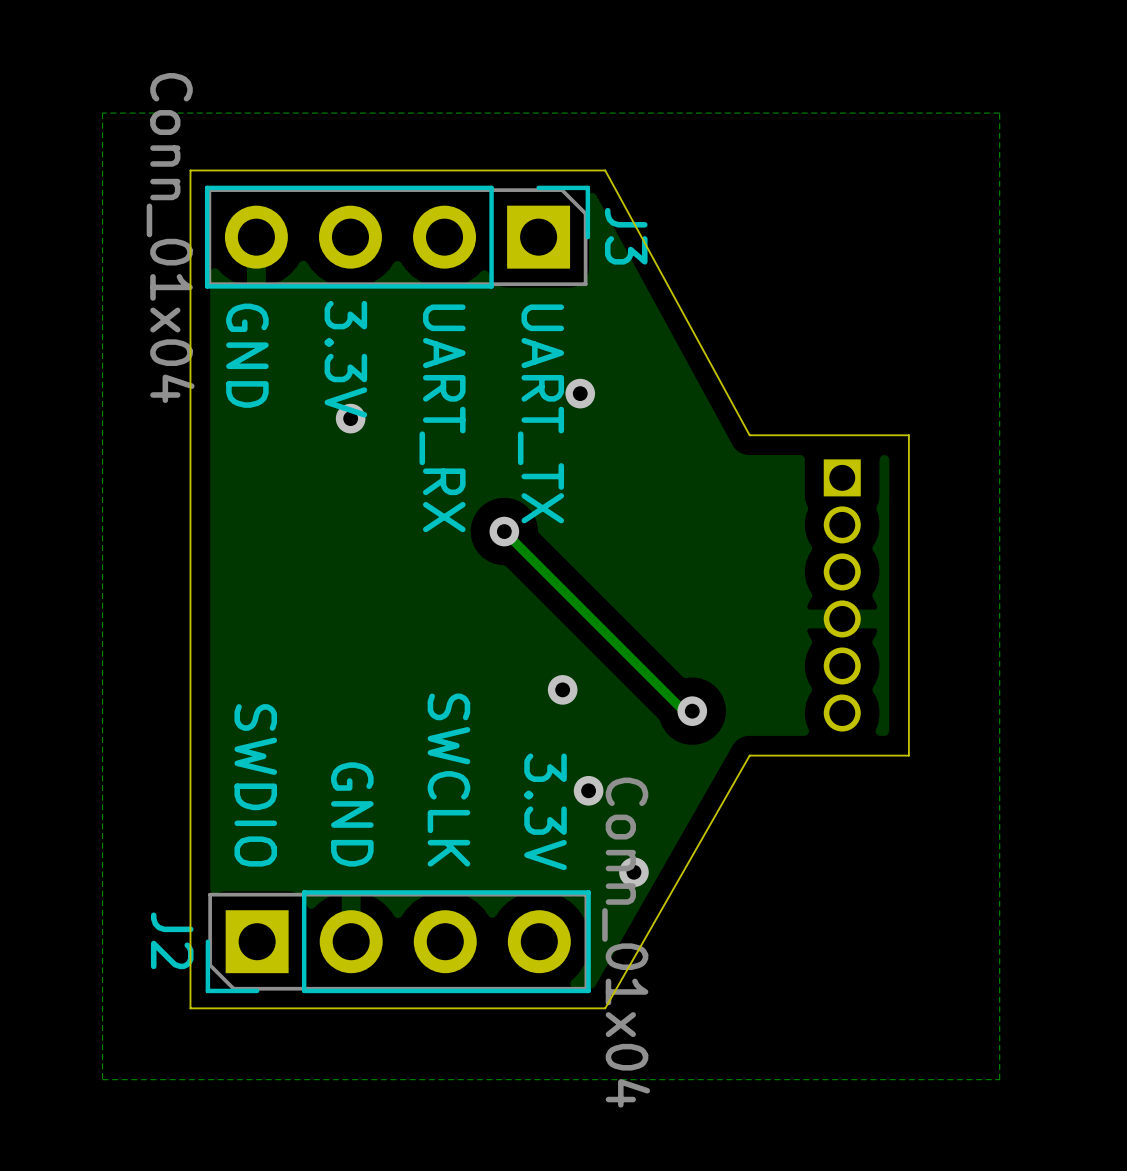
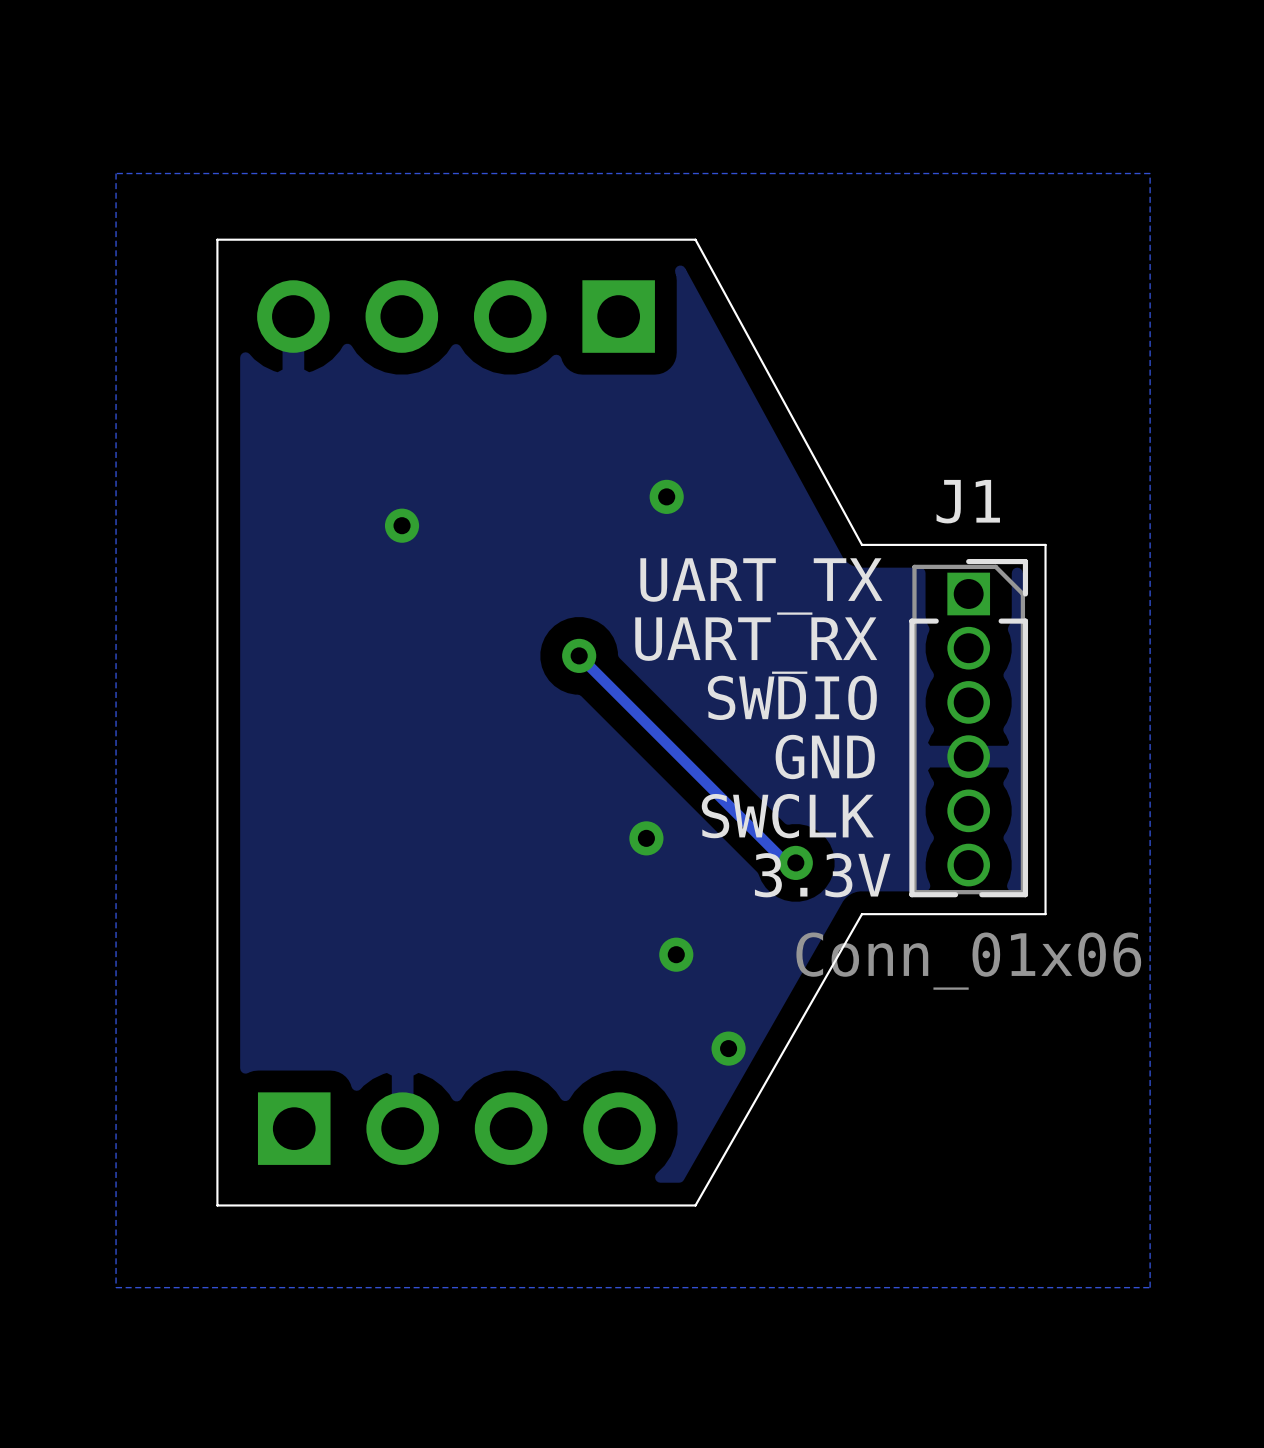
J3 side: bottom (397, 237) -> top (456, 316)
text: GND (247, 355) -> none
text: 3.3V (345, 359) -> none
text rotation: 0° (540, 413) -> 90° counterclockwise (761, 586)
text rotation: 0° (442, 418) -> 90° counterclockwise (756, 645)
J1 side: top (842, 595) -> bottom (968, 728)
text: none -> GND (825, 756)
text rotation: 0° (448, 780) -> 90° counterclockwise (787, 816)
text position: SWCLK (448, 780) -> SWCLK (787, 816)
text rotation: 0° (255, 785) -> 90° counterclockwise (792, 697)
text position: SWDIO (255, 785) -> SWDIO (792, 697)
text rotation: 0° (545, 811) -> 90° counterclockwise (822, 875)
text position: 3.3V (545, 811) -> 3.3V (822, 875)
text: GND (352, 814) -> none
J2 side: bottom (398, 941) -> top (456, 1128)

